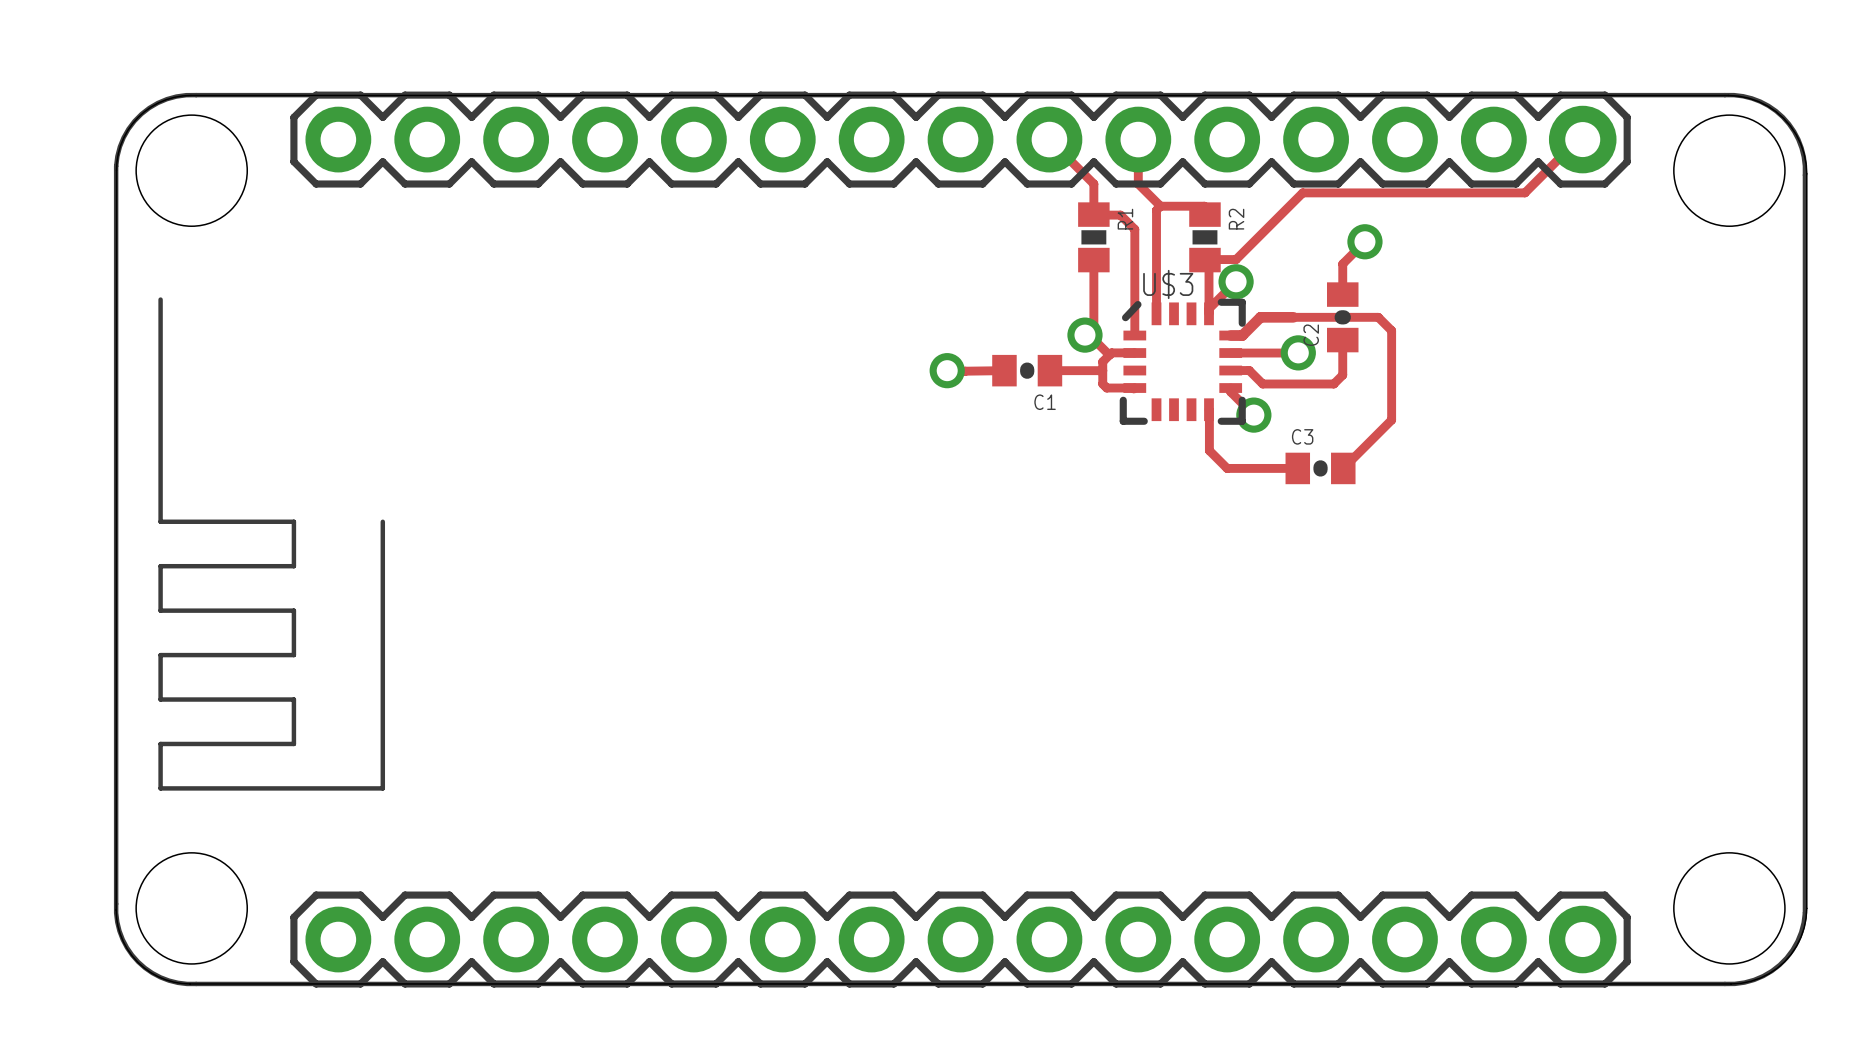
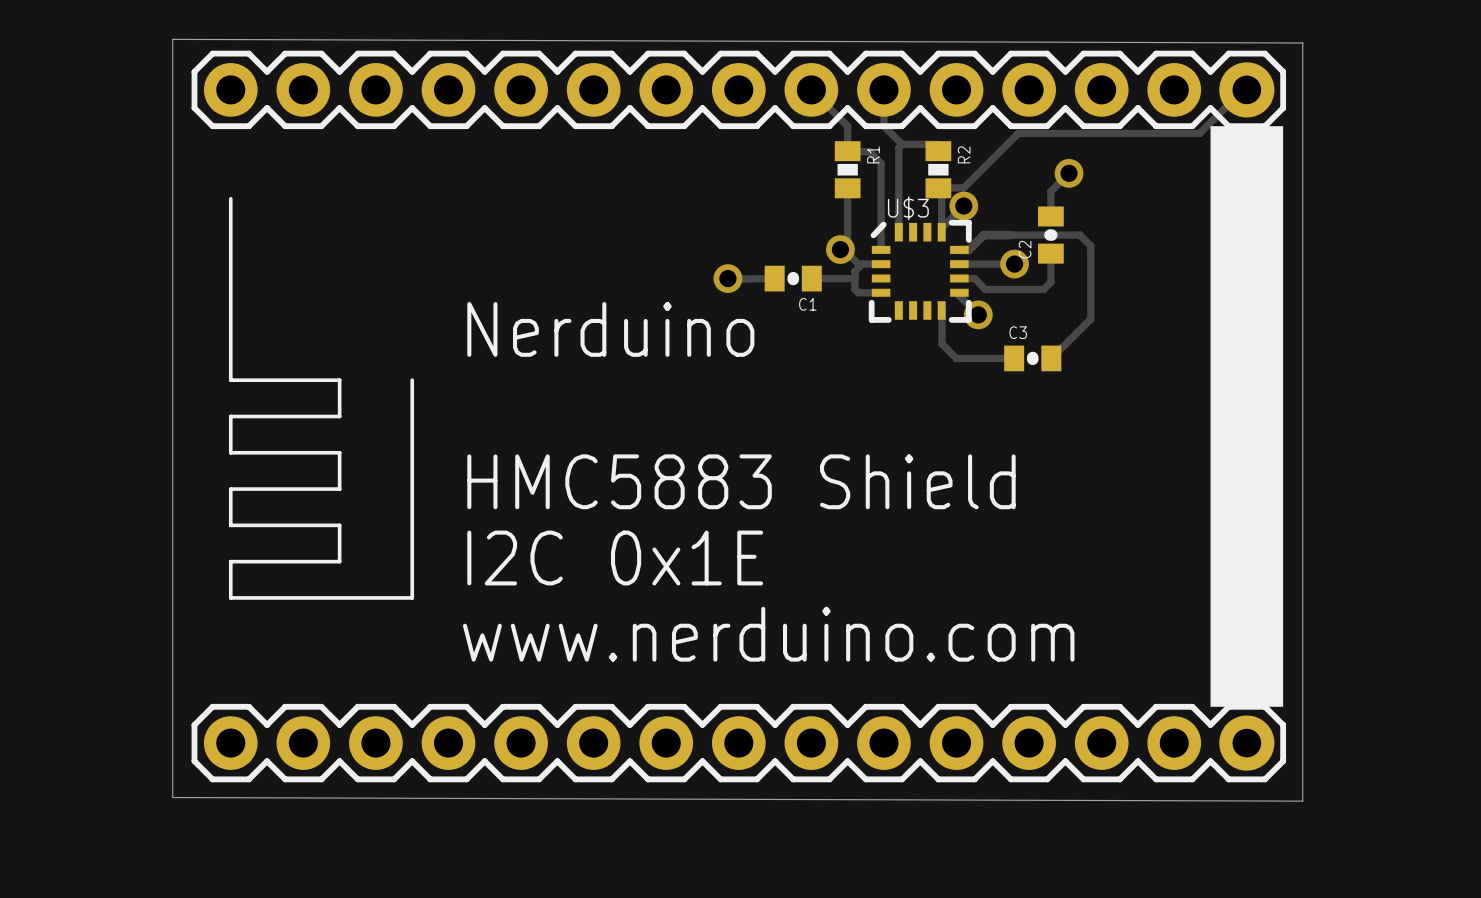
part footprint: [113, 91, 1808, 988] -> [191, 50, 1287, 783]
board edge: (190, 95) (1728, 95) (1748, 98) (1767, 105) (1783, 118) (1796, 134) (1804, 153) (1806, 173) (1806, 908) (1804, 927) (1796, 946) (1784, 961) (1768, 973) (1750, 981) (1731, 983) (190, 983) (173, 982) (158, 976) (137, 962) (127, 949) (120, 934) (116, 909) (116, 170) (120, 145) (127, 130) (138, 117) (158, 102) (174, 97) (190, 95) -> (172, 39) (172, 797) (1302, 801) (1302, 43) (172, 39)
text: none -> Nerduino (610, 329)
text: none -> HMC5883 Shield (741, 481)
text: none -> I2C 0x1E (615, 558)
text: none -> www.nerduino.com (768, 634)

